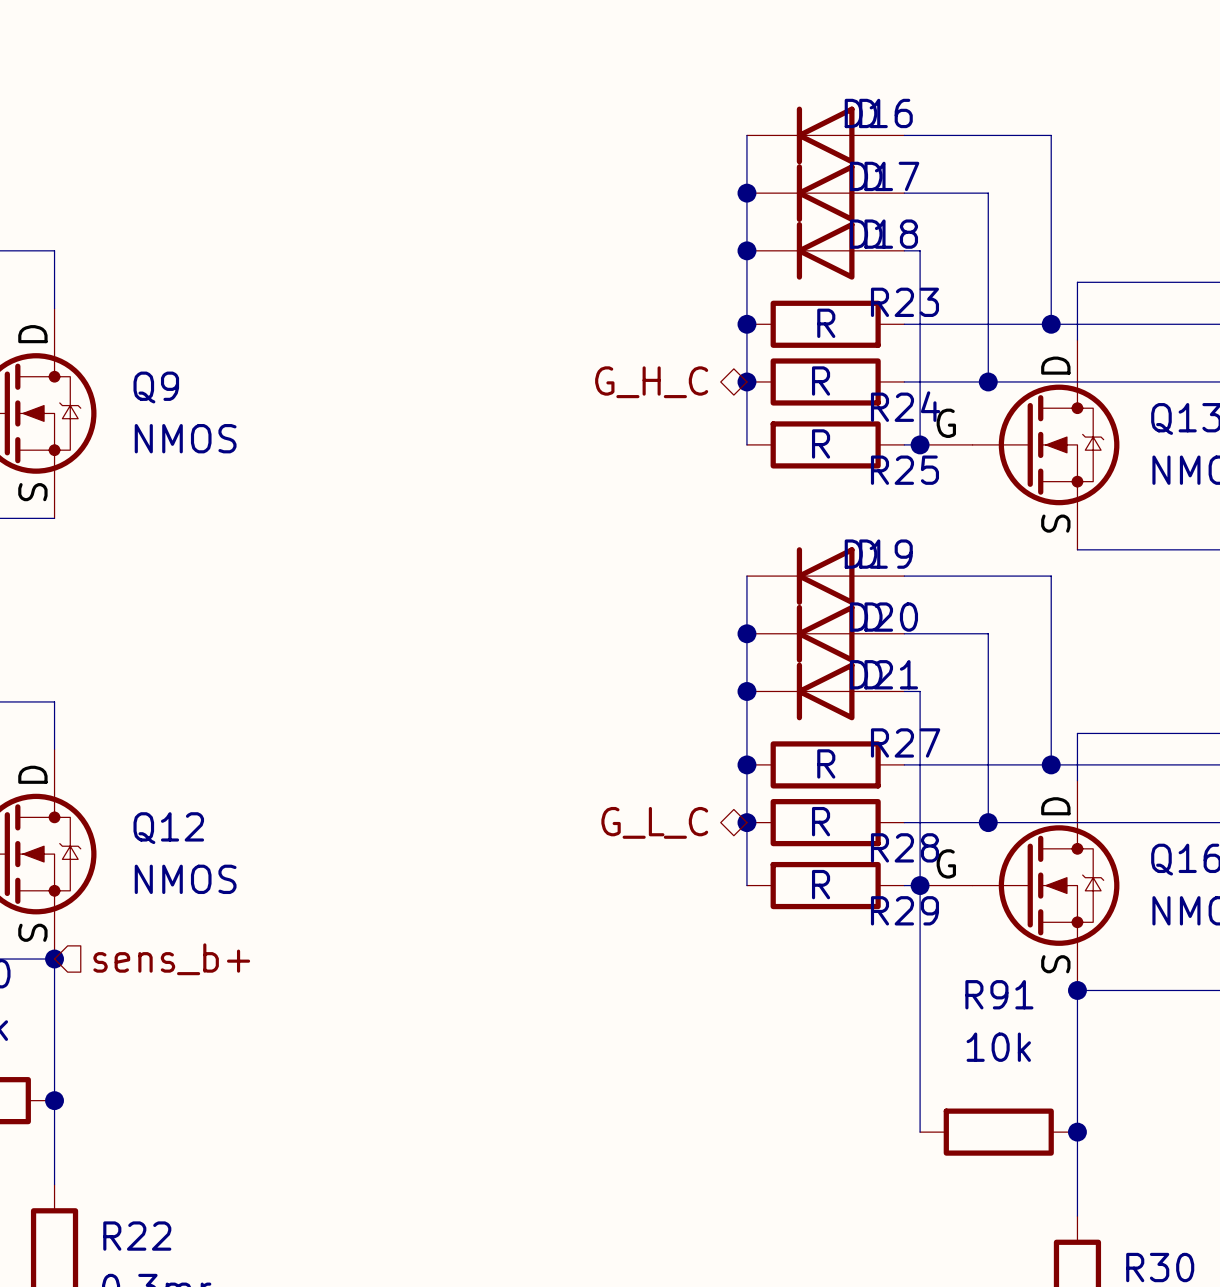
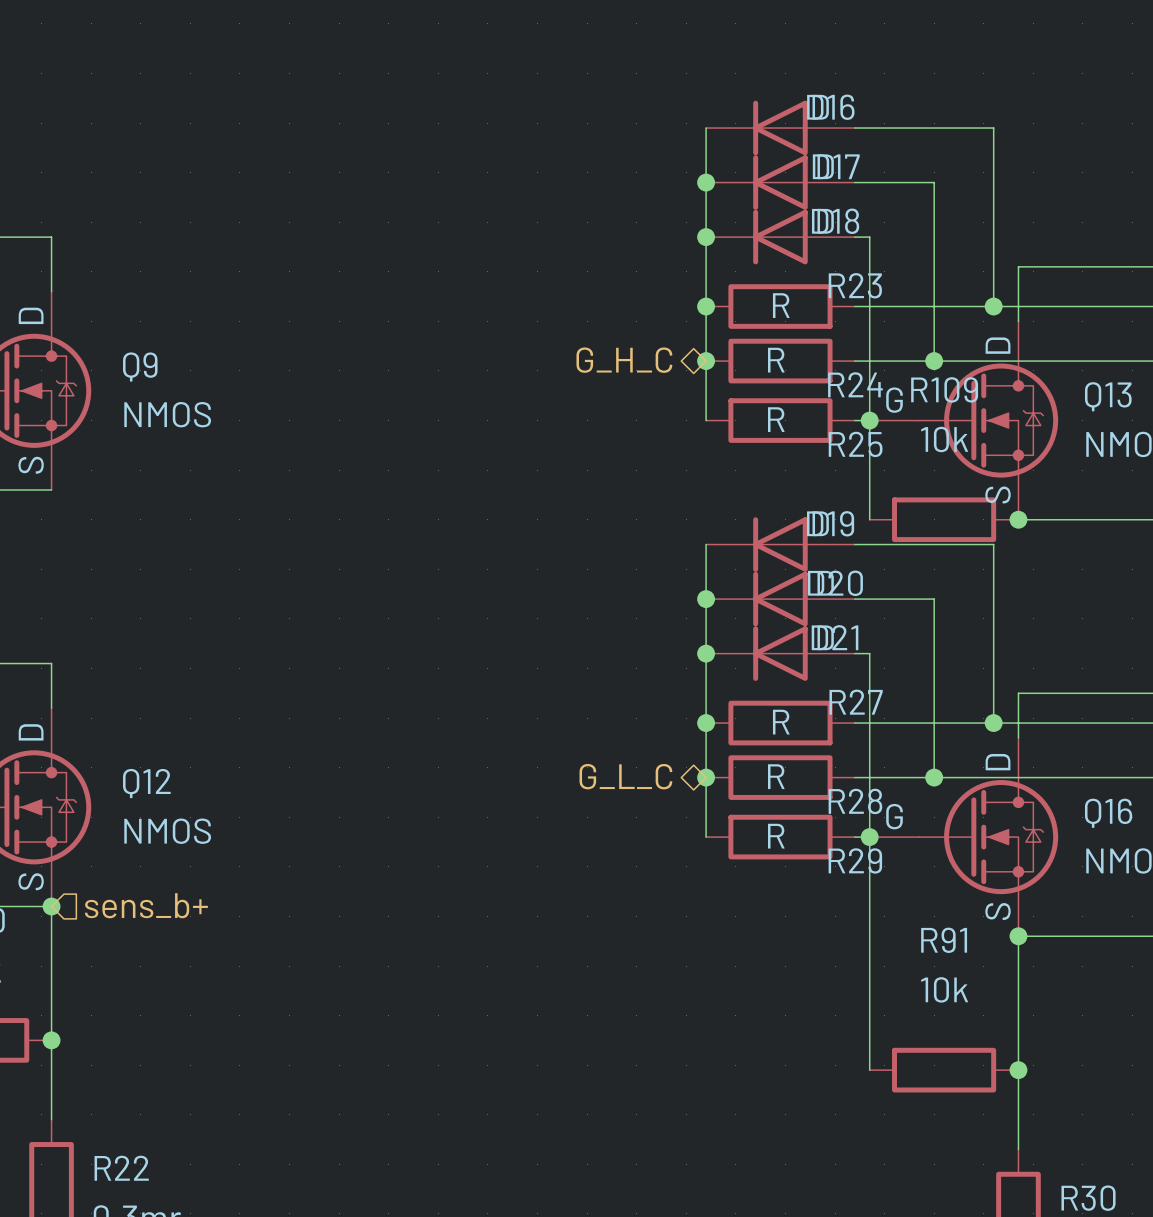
wire: none -> (869, 420) (869, 519)
R109: none -> 10k (944, 519)
junction: none -> (1018, 519)

